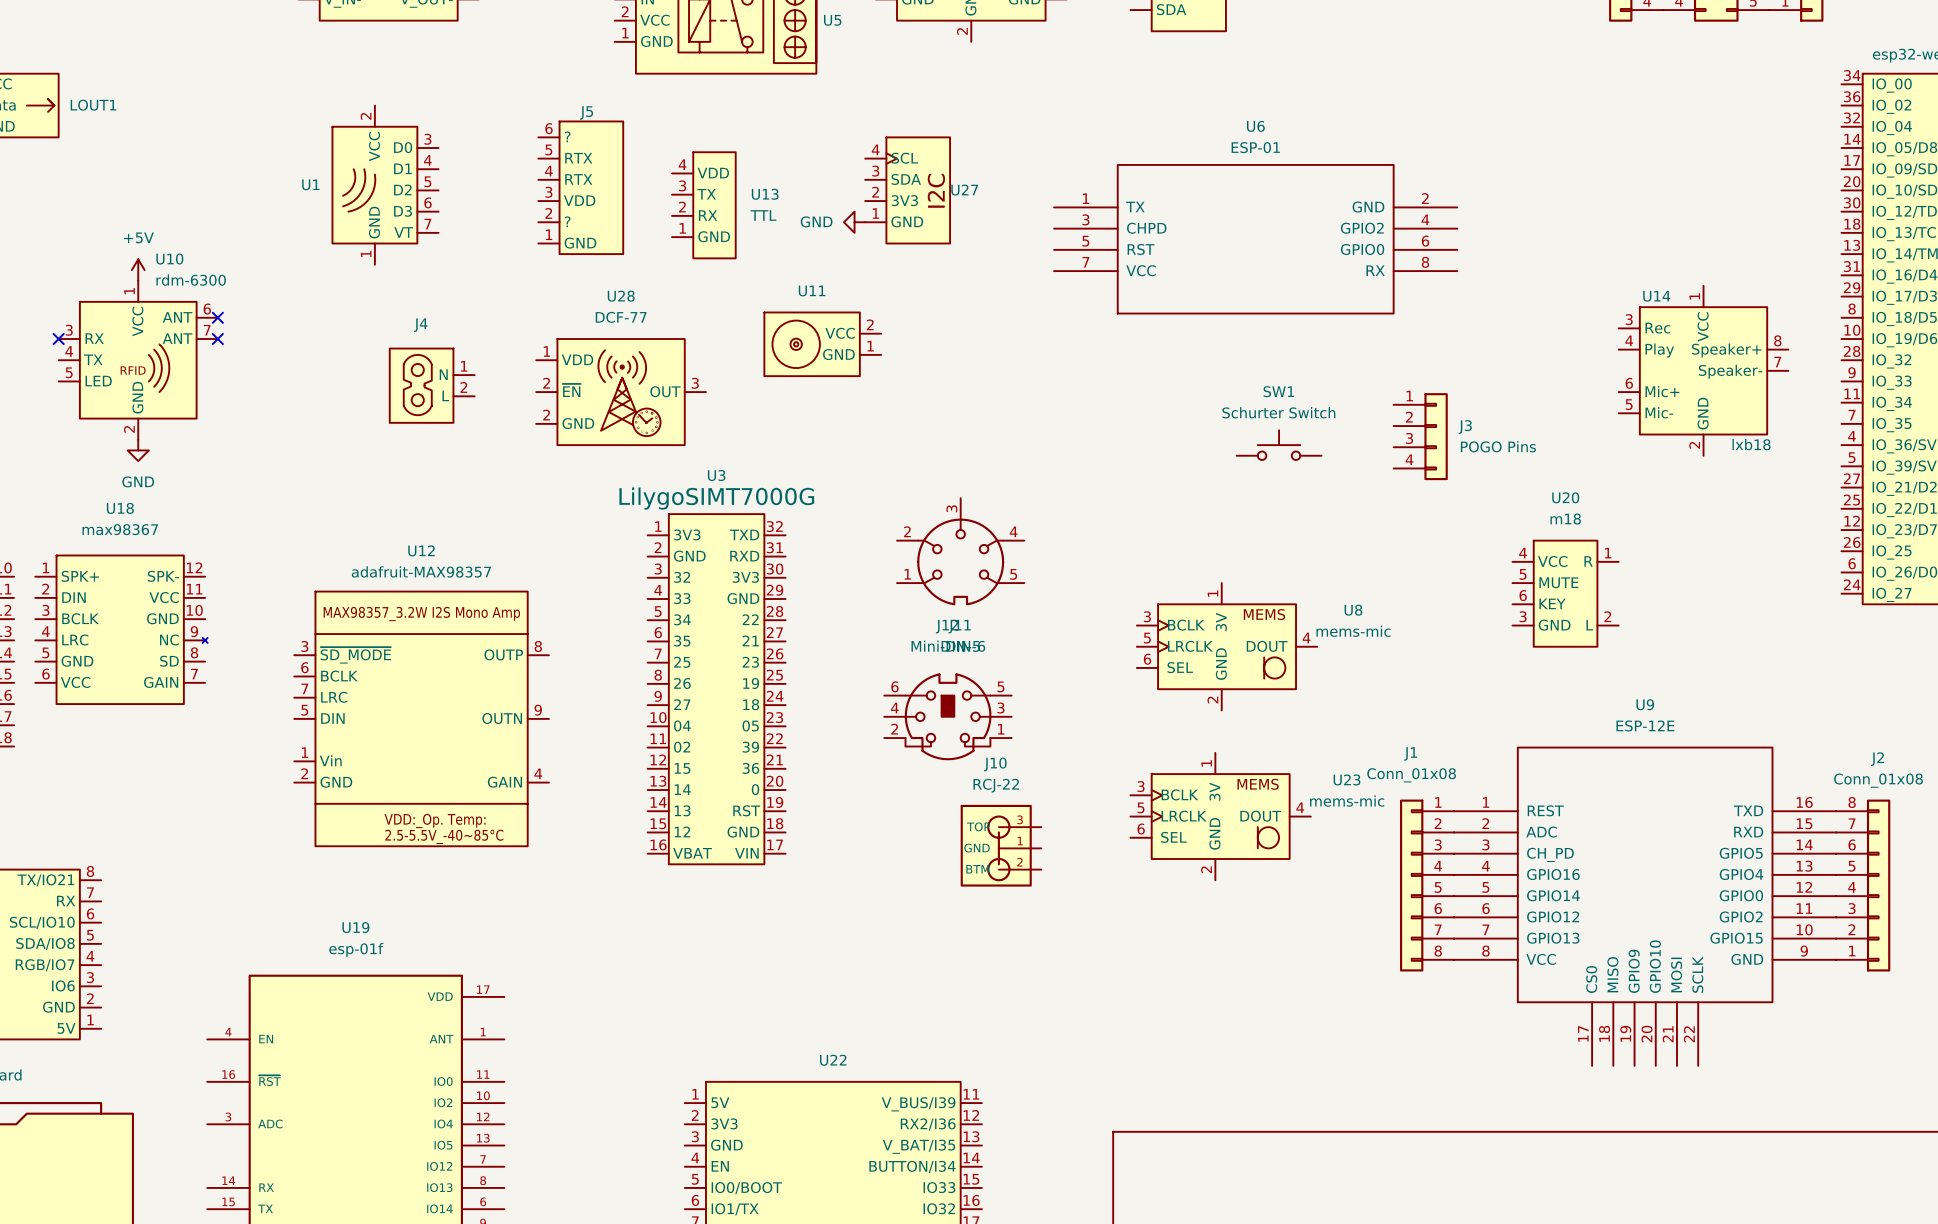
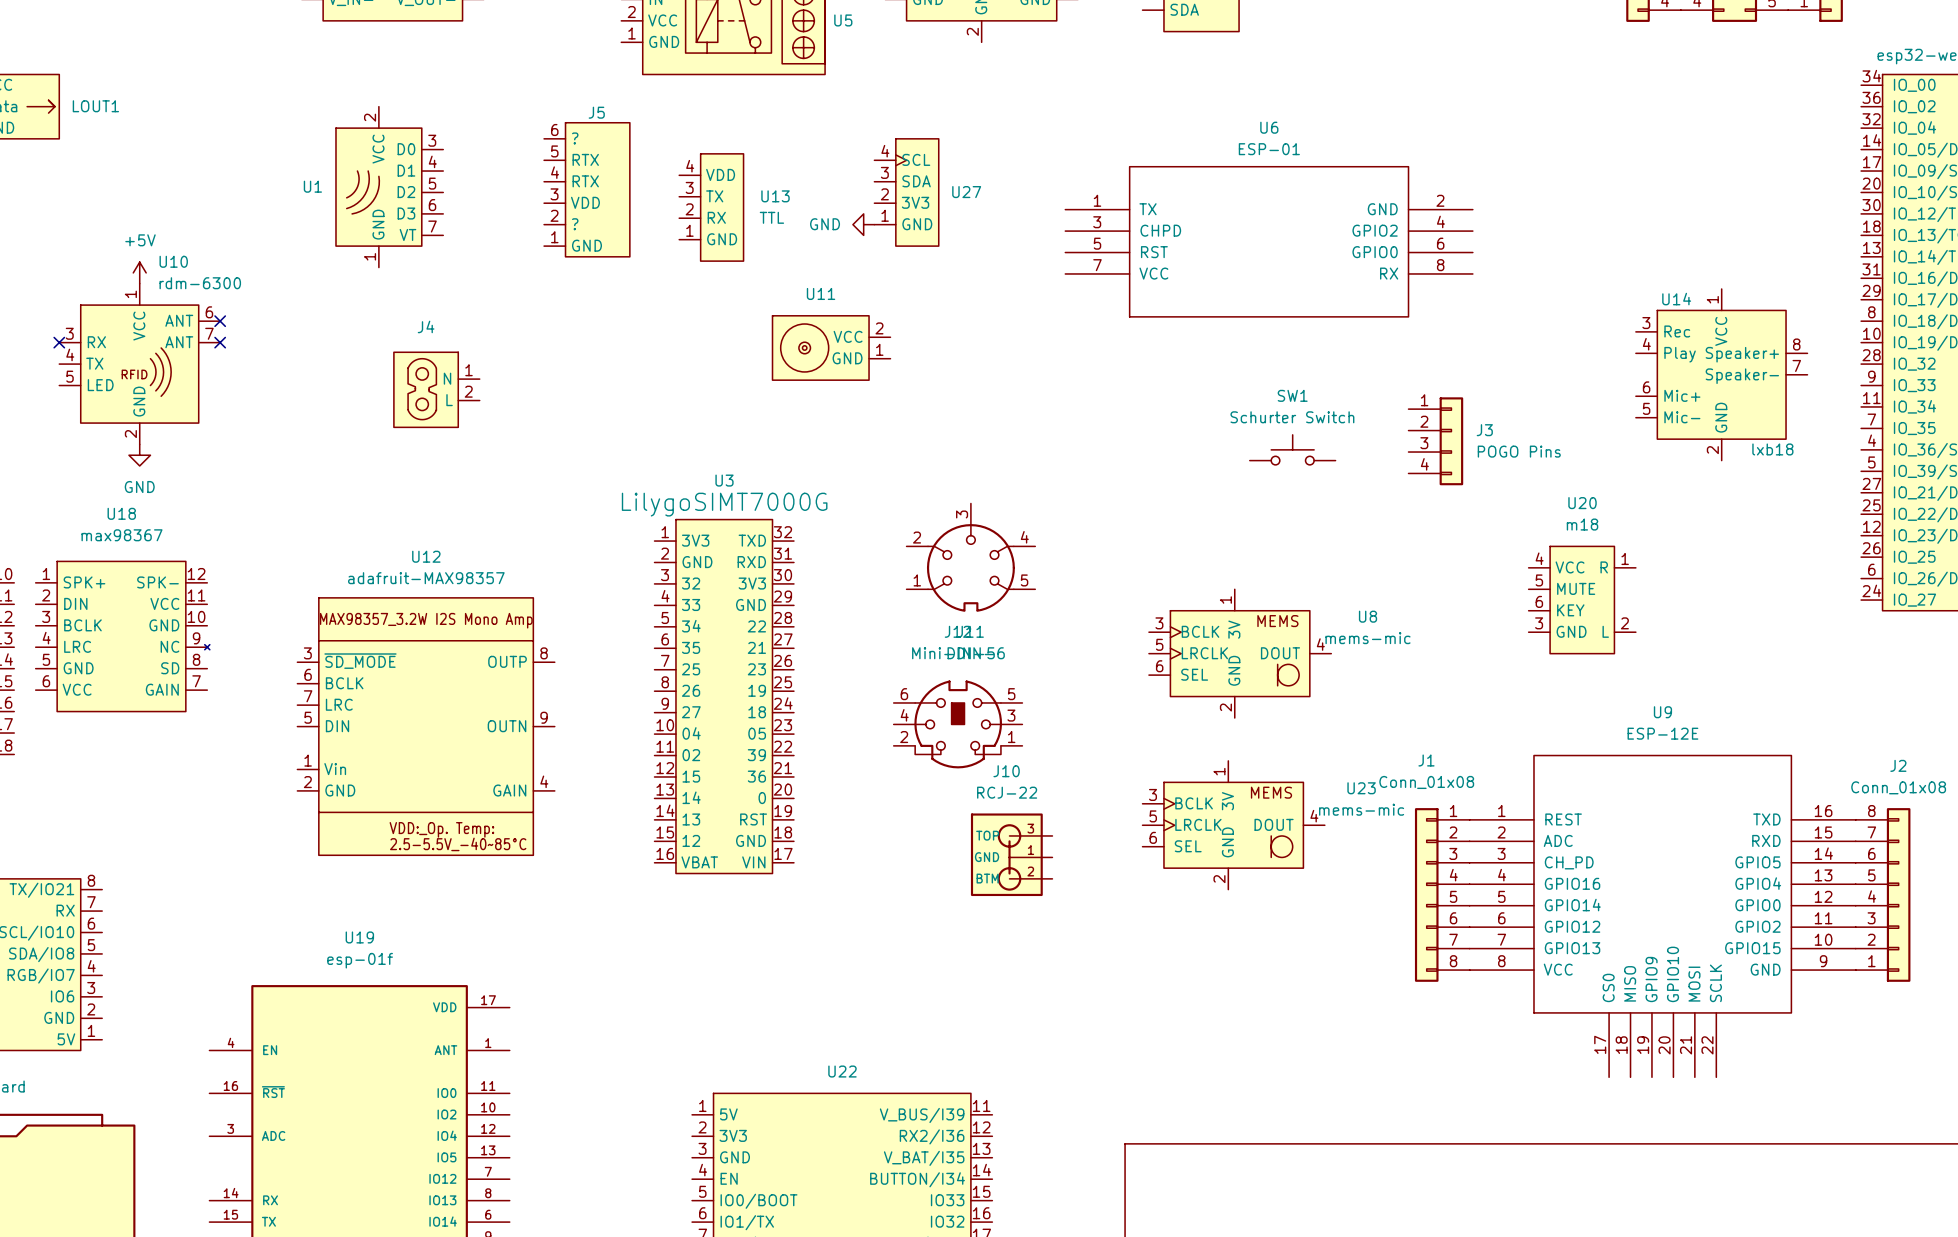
U27 symbol: [865, 137, 951, 244] -> [874, 138, 939, 247]
U28: DCF-77 (621, 392) -> none

